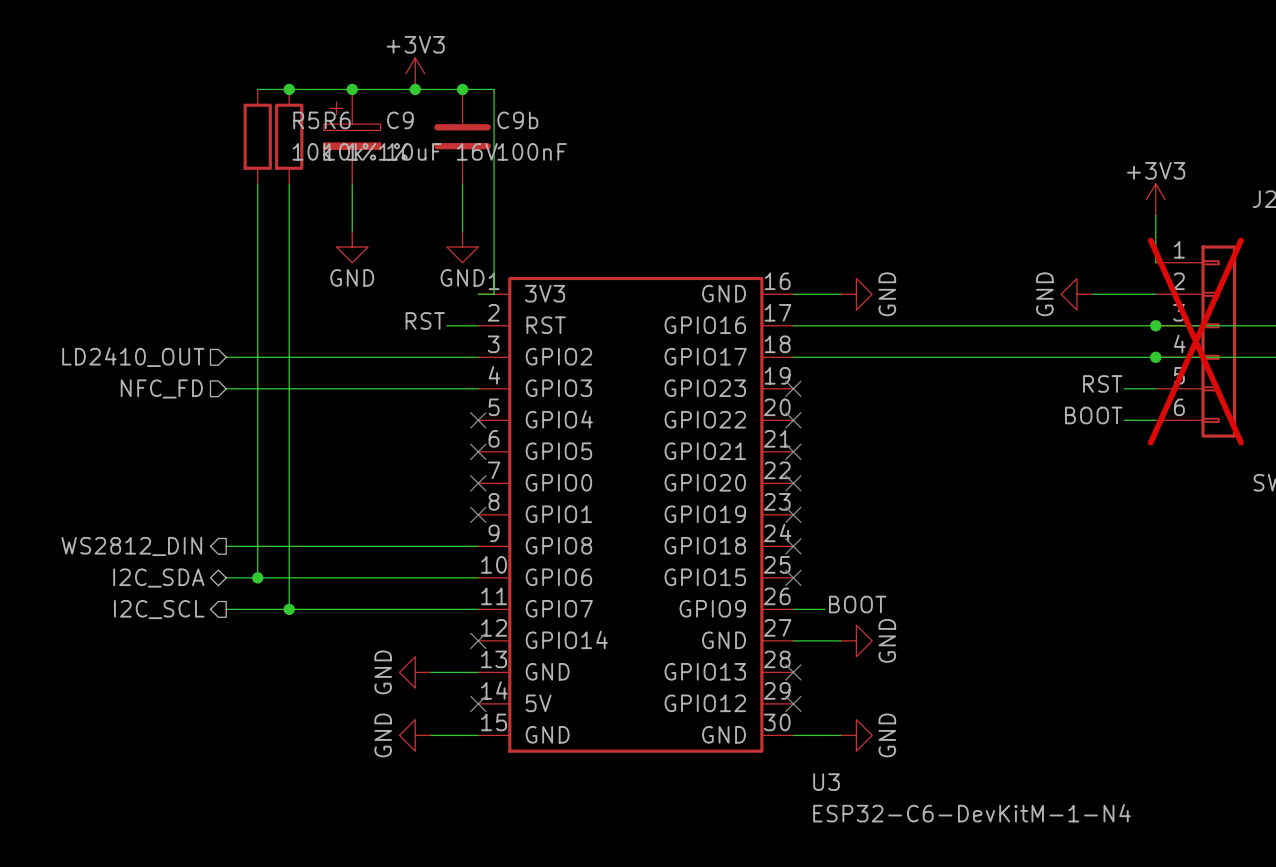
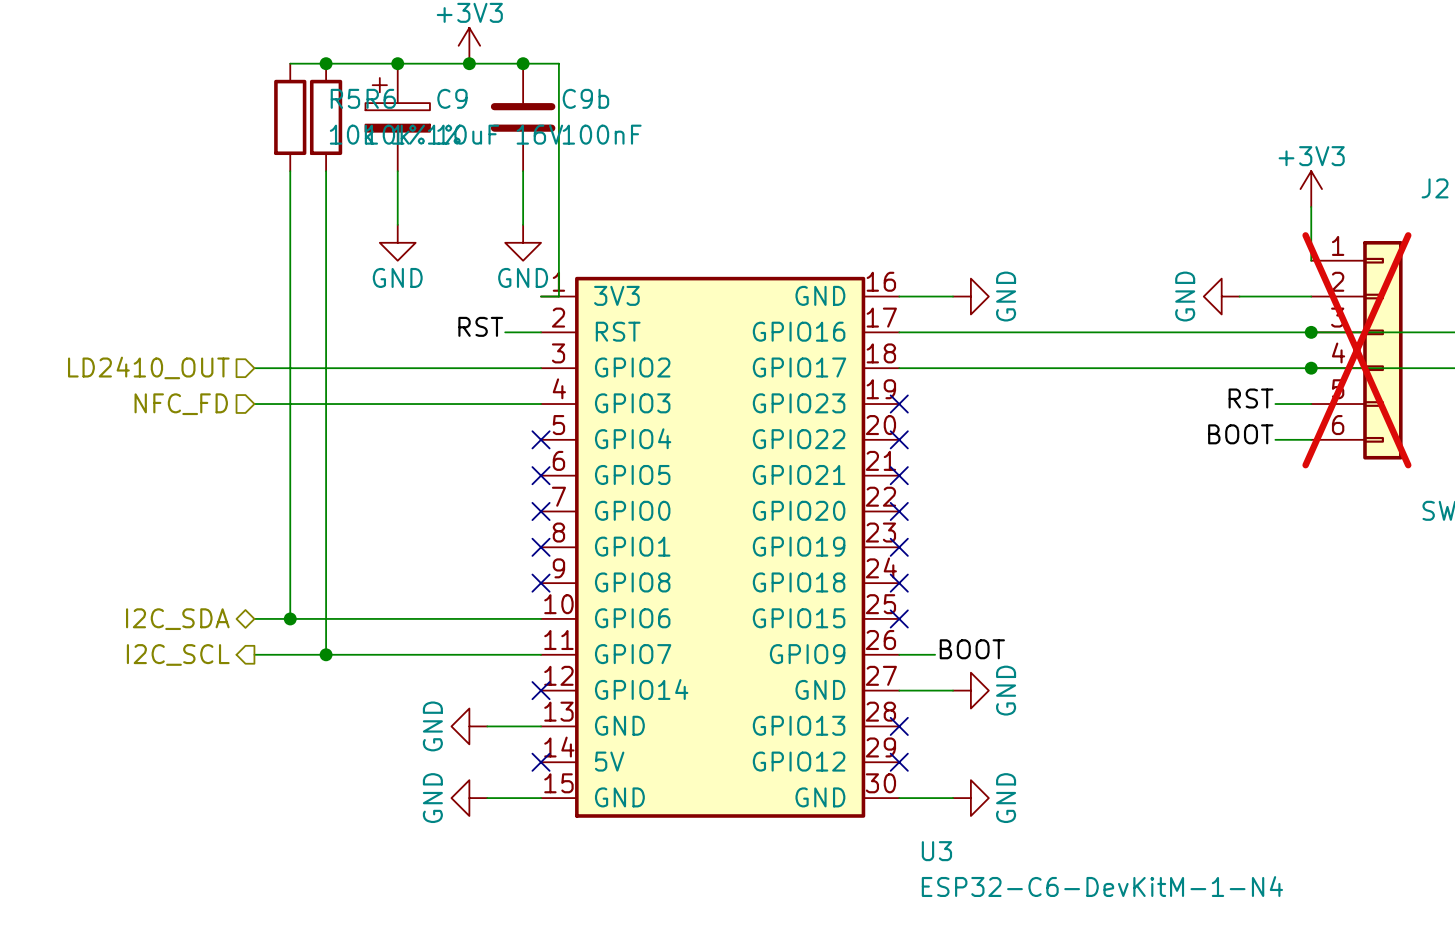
hierarchical label: WS2812_DIN (131, 546) -> none
wire: (226, 546) (478, 546) -> none
no-connect mark: none -> (541, 583)

